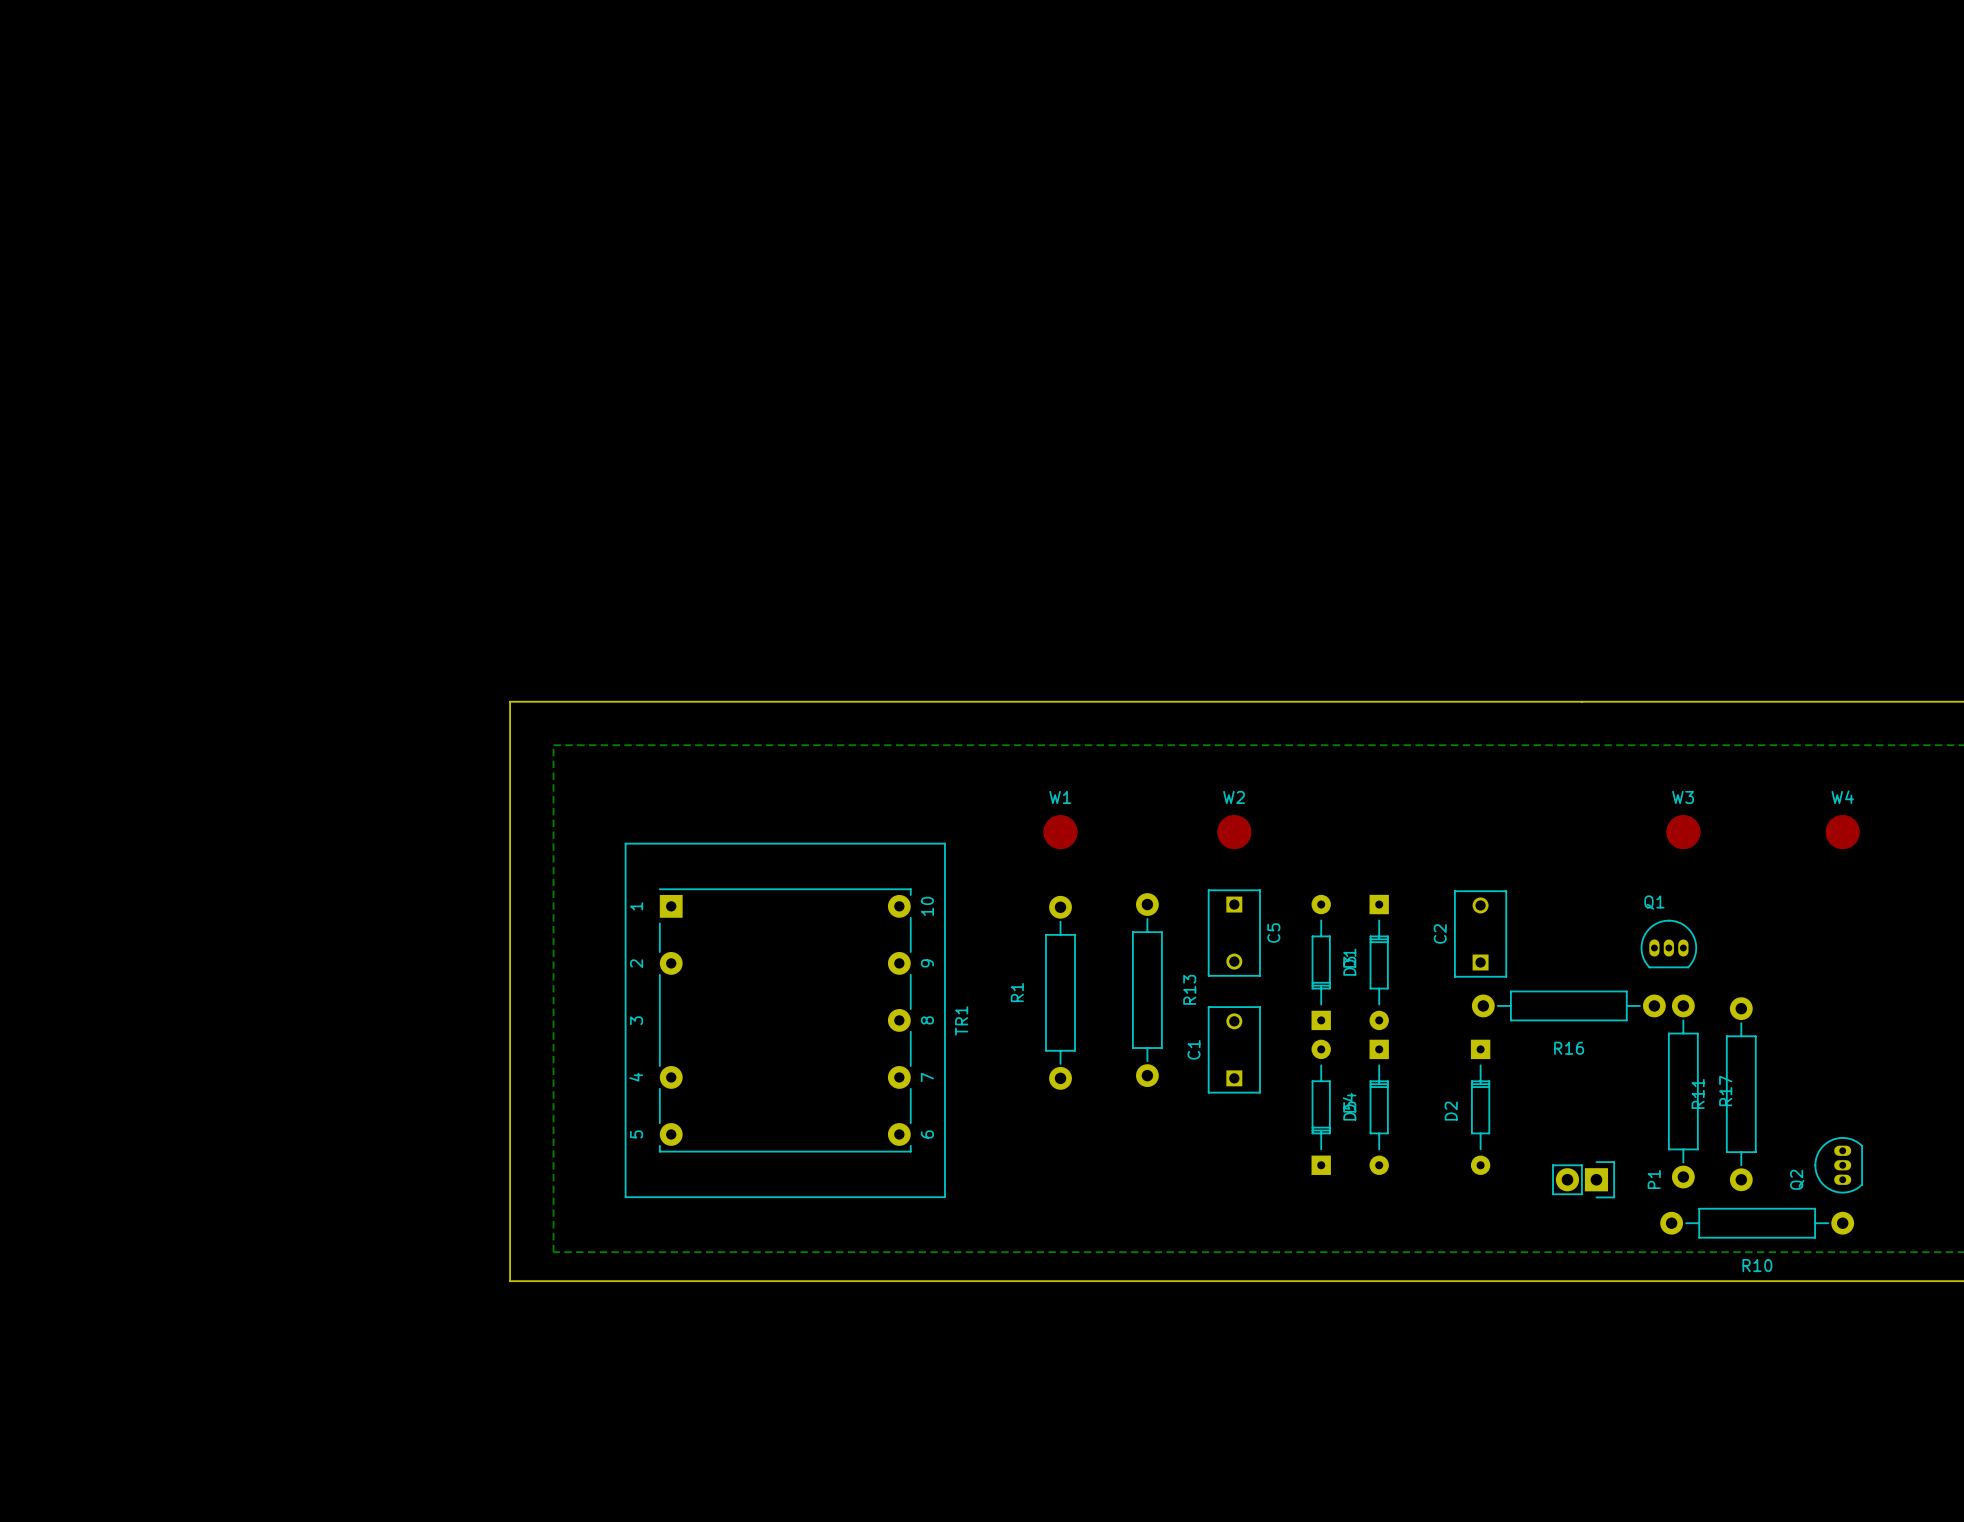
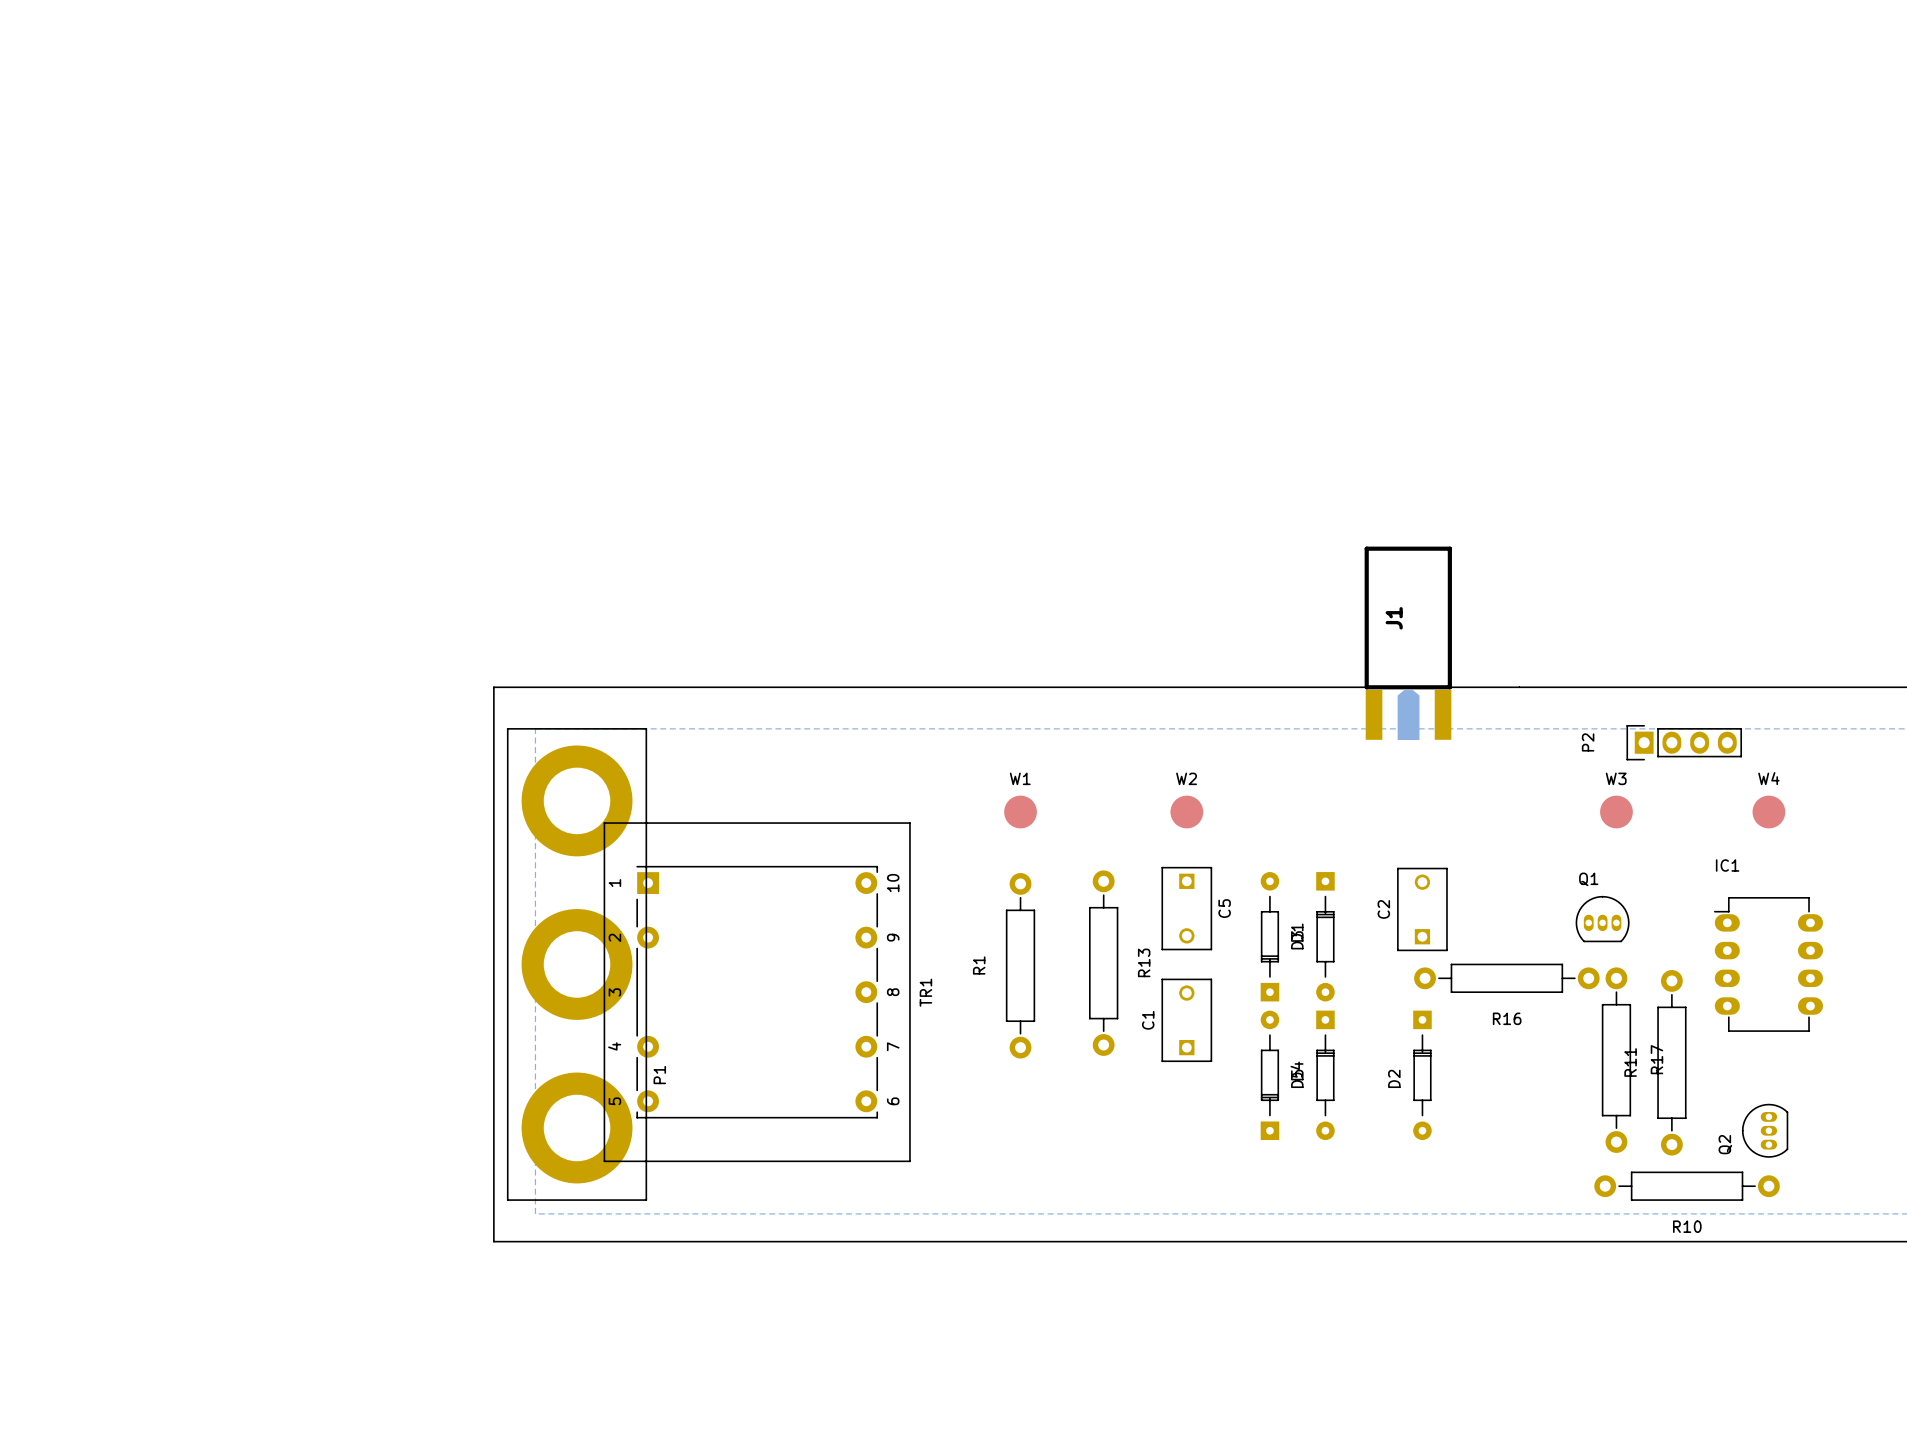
J1: none -> (1408, 643)
P2: none -> (1684, 742)
IC1: none -> (1768, 964)
P1 footprint: [1552, 1161, 1615, 1199] -> [506, 728, 648, 1201]
P1 name position: P1 (1654, 1179) -> P1 (659, 1075)

